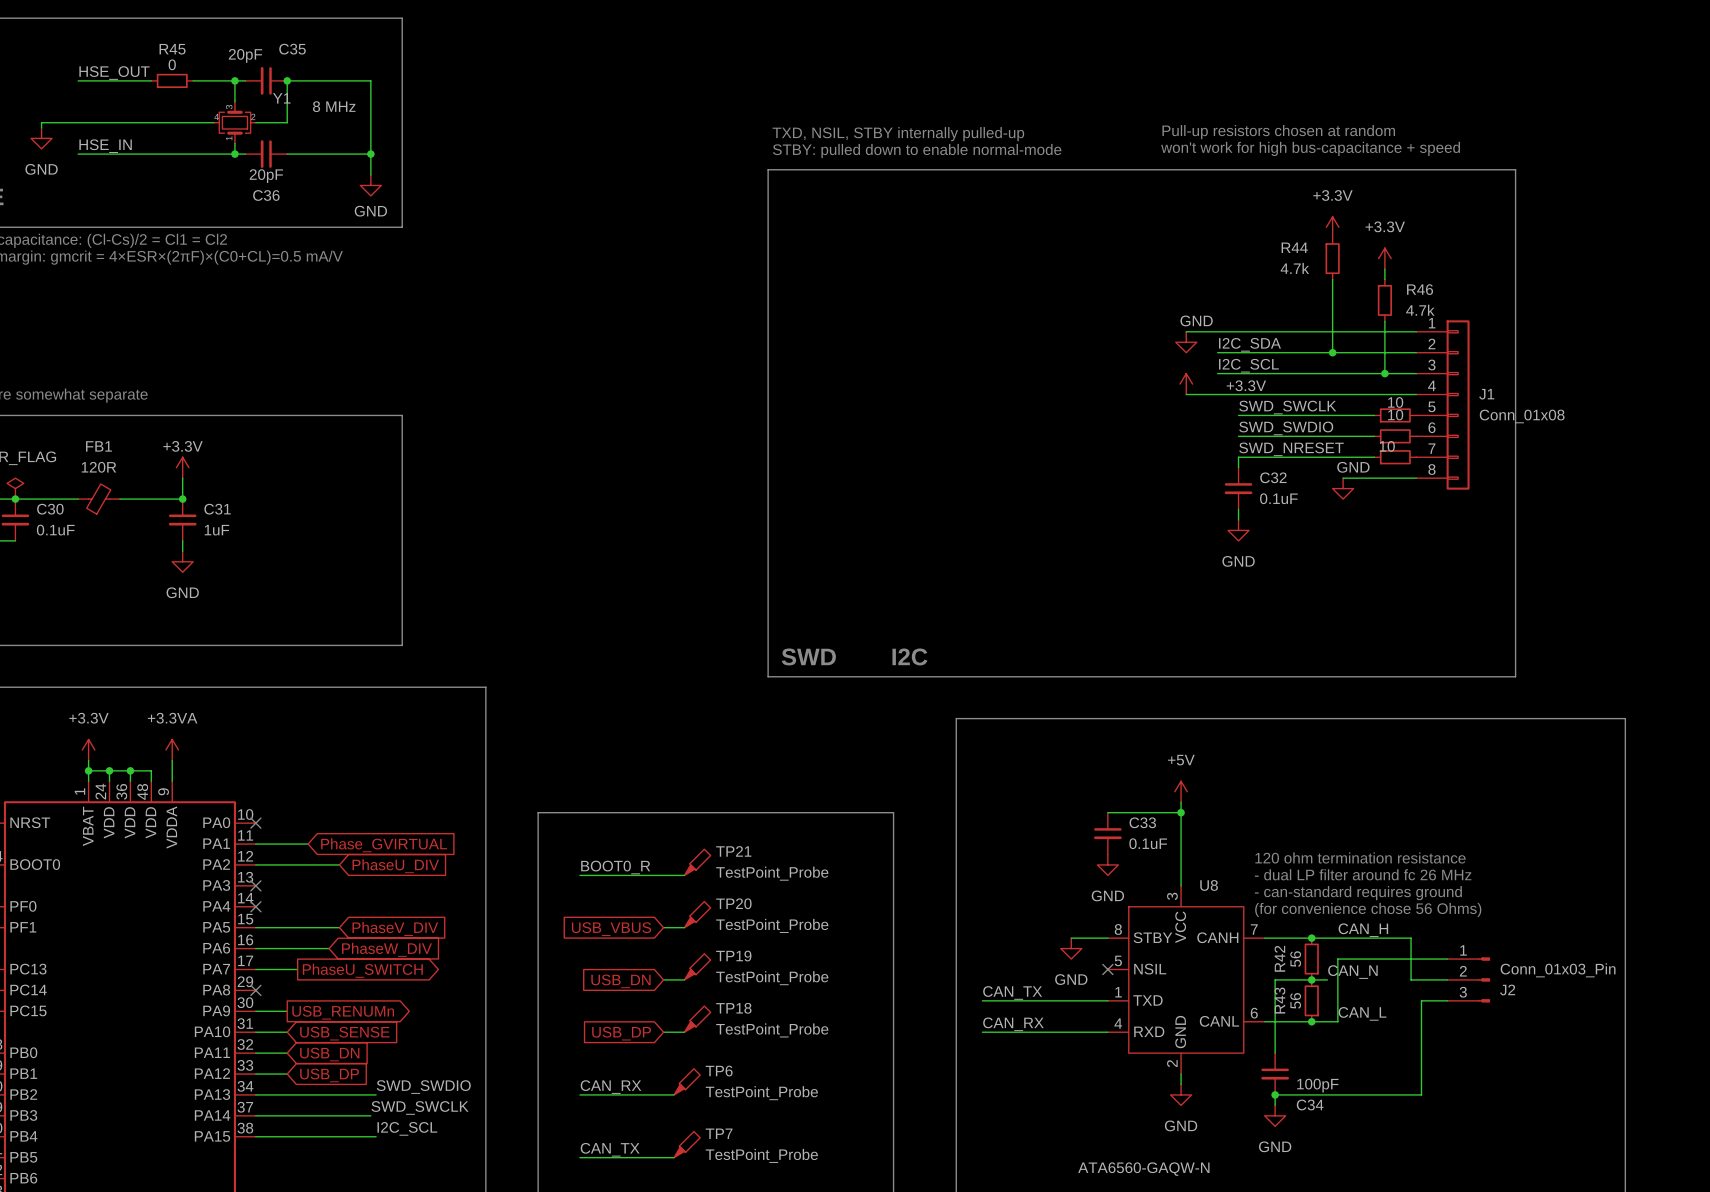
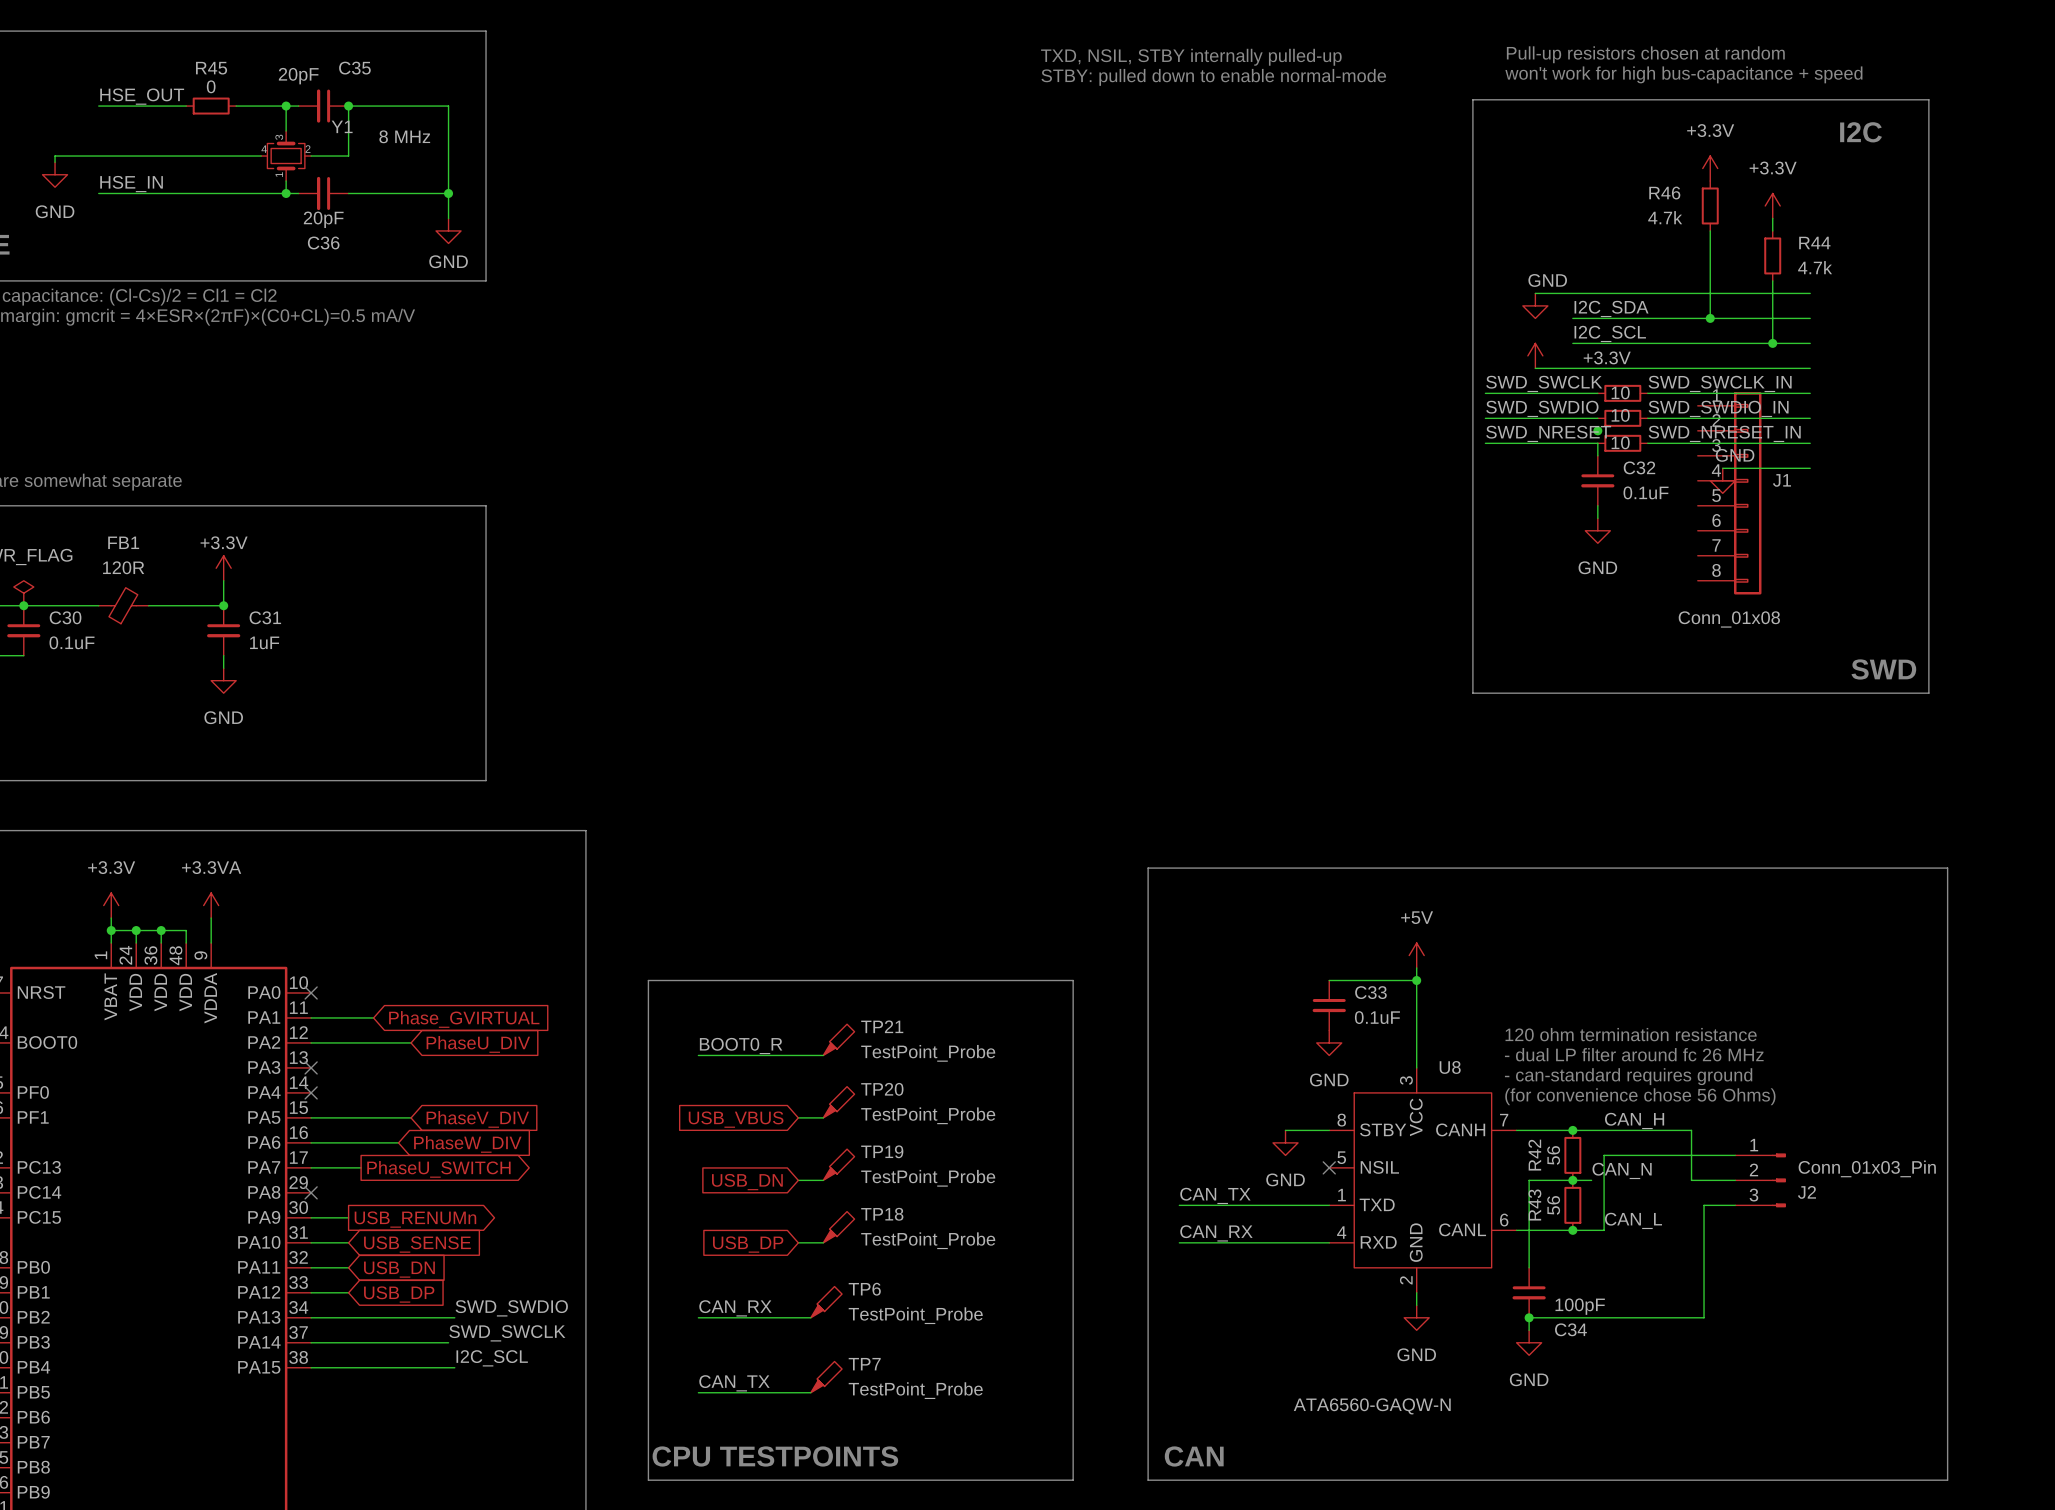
line: none -> (1472, 99) (1928, 99) (1928, 693) (1472, 693) (1472, 99)
text: none -> I2C (1861, 132)
text position: Pull-up resistors chosen at random (1278, 132) -> Pull-up resistors chosen at random (1645, 54)
power symbol: none -> +3.3V (1710, 168)
text position: TXD, NSIL, STBY internally pulled-up (898, 134) -> TXD, NSIL, STBY internally pulled-up (1191, 57)
text position: won't work for high bus-capacitance + speed (1310, 148) -> won't work for high bus-capacitance + speed (1683, 74)
text position: STBY: pulled down to enable normal-mode (917, 151) -> STBY: pulled down to enable normal-mode (1213, 77)
power symbol: none -> +3.3V (1772, 205)
line: (768, 169) (1515, 169) (1515, 676) (768, 676) (768, 169) -> none
power symbol: +3.3V (1332, 227) -> none
R44 name position: R44 (1294, 247) -> R44 (1814, 242)
power symbol: none -> GND (1535, 305)
R44 position: (1332, 258) -> (1772, 255)
power symbol: +3.3V (1384, 258) -> none
junction: none -> (1710, 318)
R44 value position: 4.7k (1294, 268) -> 4.7k (1815, 267)
wire: (1384, 269) (1384, 279) -> (1772, 218) (1772, 230)
wire: (1332, 279) (1332, 352) -> (1710, 230) (1710, 318)
junction: none -> (1772, 343)
power symbol: none -> +3.3V (1535, 355)
R46 name position: R46 (1420, 289) -> R46 (1664, 193)
R46 position: (1384, 300) -> (1710, 205)
R46 value position: 4.7k (1420, 310) -> 4.7k (1665, 217)
label: none -> SWD_SWCLK_IN (1720, 383)
wire: none -> (1485, 393) (1597, 393)
part: none -> 10 (1622, 393)
wire: none -> (1647, 393) (1810, 393)
wire: (1384, 321) (1384, 373) -> (1772, 280) (1772, 343)
wire: (1186, 331) (1416, 331) -> (1535, 293) (1810, 293)
label: none -> SWD_SWDIO_IN (1718, 408)
power symbol: GND (1186, 342) -> none
wire: none -> (1485, 418) (1597, 418)
part: none -> 10 (1622, 418)
label position: I2C_SDA (1249, 344) -> I2C_SDA (1611, 308)
wire: (1217, 352) (1416, 352) -> (1572, 318) (1810, 318)
label: none -> SWD_NRESET_IN (1724, 433)
wire: none -> (1485, 443) (1597, 443) (1597, 455)
part: none -> 10 (1622, 443)
label position: I2C_SCL (1248, 365) -> I2C_SCL (1610, 333)
wire: (1217, 373) (1416, 373) -> (1572, 343) (1810, 343)
junction: (1384, 373) -> none
power symbol: +3.3V (1186, 384) -> none
wire: (1186, 394) (1416, 394) -> (1535, 368) (1810, 368)
power symbol: none -> GND (1722, 480)
label position: SWD_SWCLK (1287, 407) -> SWD_SWCLK (1544, 383)
wire: (1238, 415) (1374, 415) -> (1647, 418) (1810, 418)
part: 10 (1395, 415) -> none
J1 value position: Conn_01x08 (1522, 416) -> Conn_01x08 (1729, 619)
label position: SWD_SWDIO (1286, 428) -> SWD_SWDIO (1542, 408)
wire: (1238, 436) (1374, 436) -> (1647, 443) (1810, 443)
part: 10 (1395, 436) -> none
label position: SWD_NRESET (1291, 449) -> SWD_NRESET (1548, 433)
wire: (1374, 457) (1238, 457) (1238, 467) -> none
part: 10 (1395, 457) -> none
power symbol text position: GND (1353, 467) -> GND (1597, 567)
wire: (1343, 478) (1416, 478) -> (1722, 468) (1810, 468)
C32 position: (1238, 488) -> (1597, 480)
power symbol position: GND (1343, 488) -> GND (1597, 530)
wire: (1238, 509) (1238, 519) -> (1597, 505) (1597, 518)
power symbol: GND (1238, 530) -> none
text: none -> SWD (1883, 669)
text: SWD (808, 656) -> none
text: I2C (909, 656) -> none

